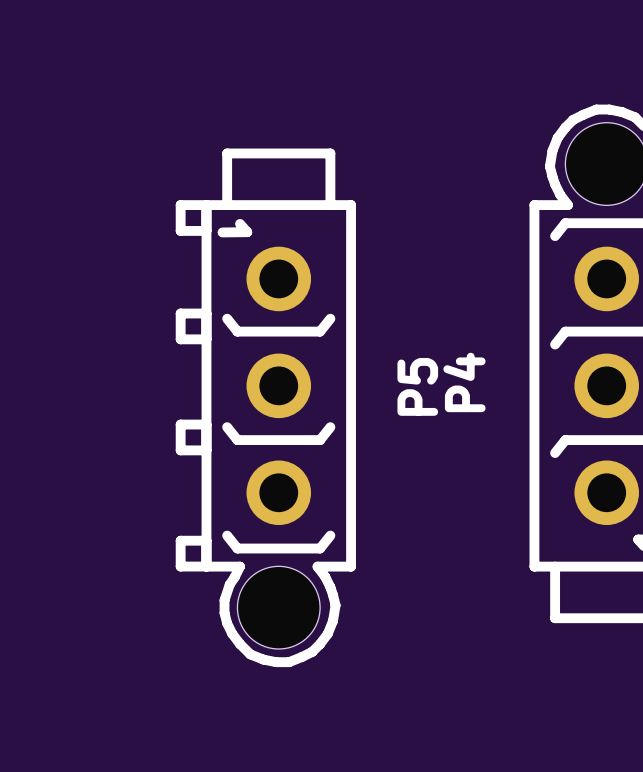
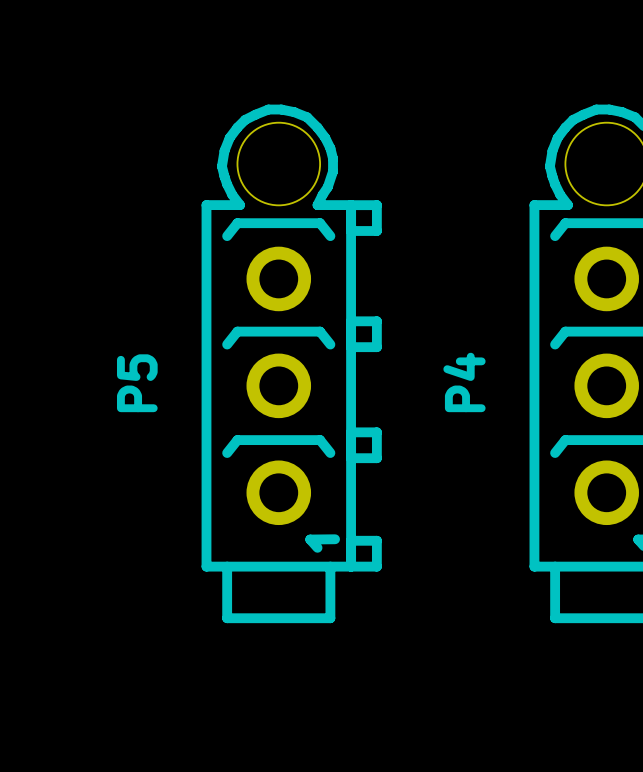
P5 rotation: 0° (265, 407) -> 180° (291, 363)

